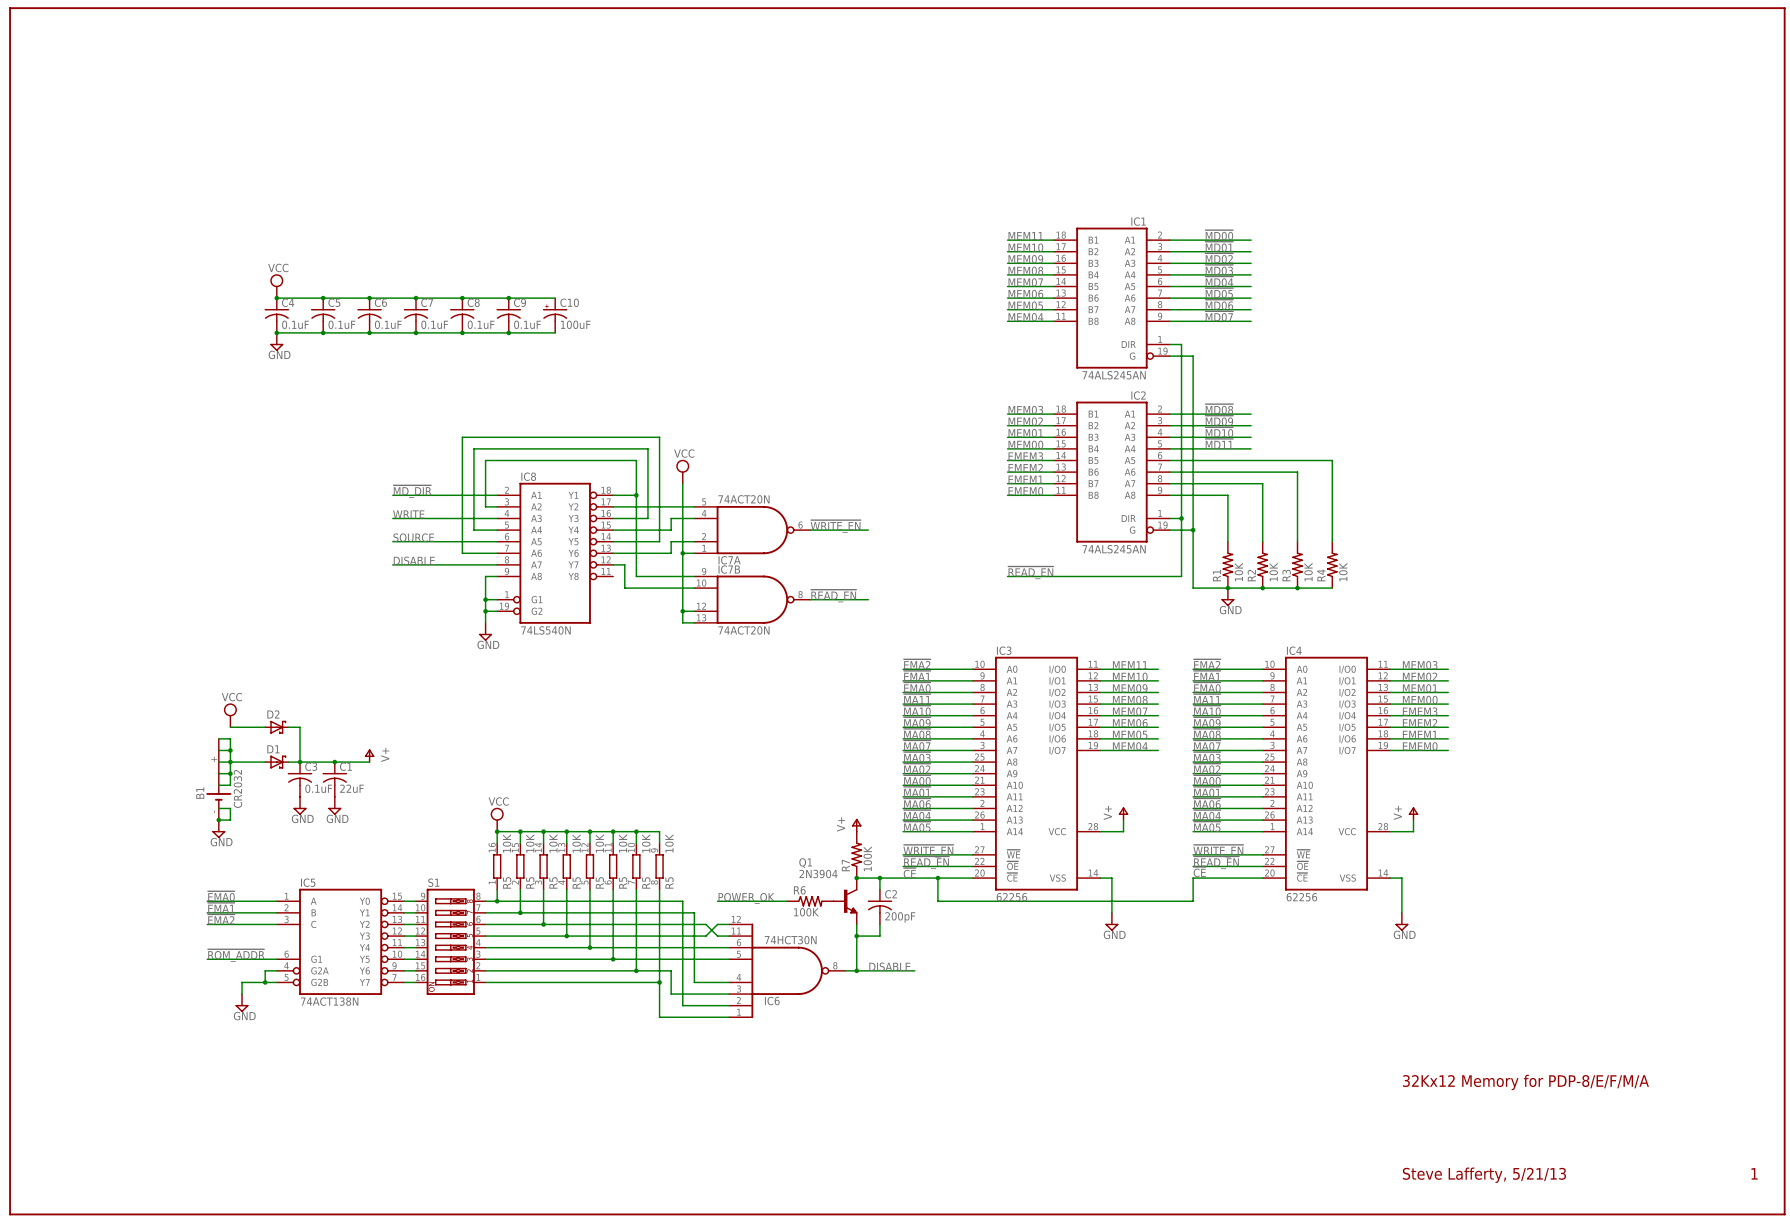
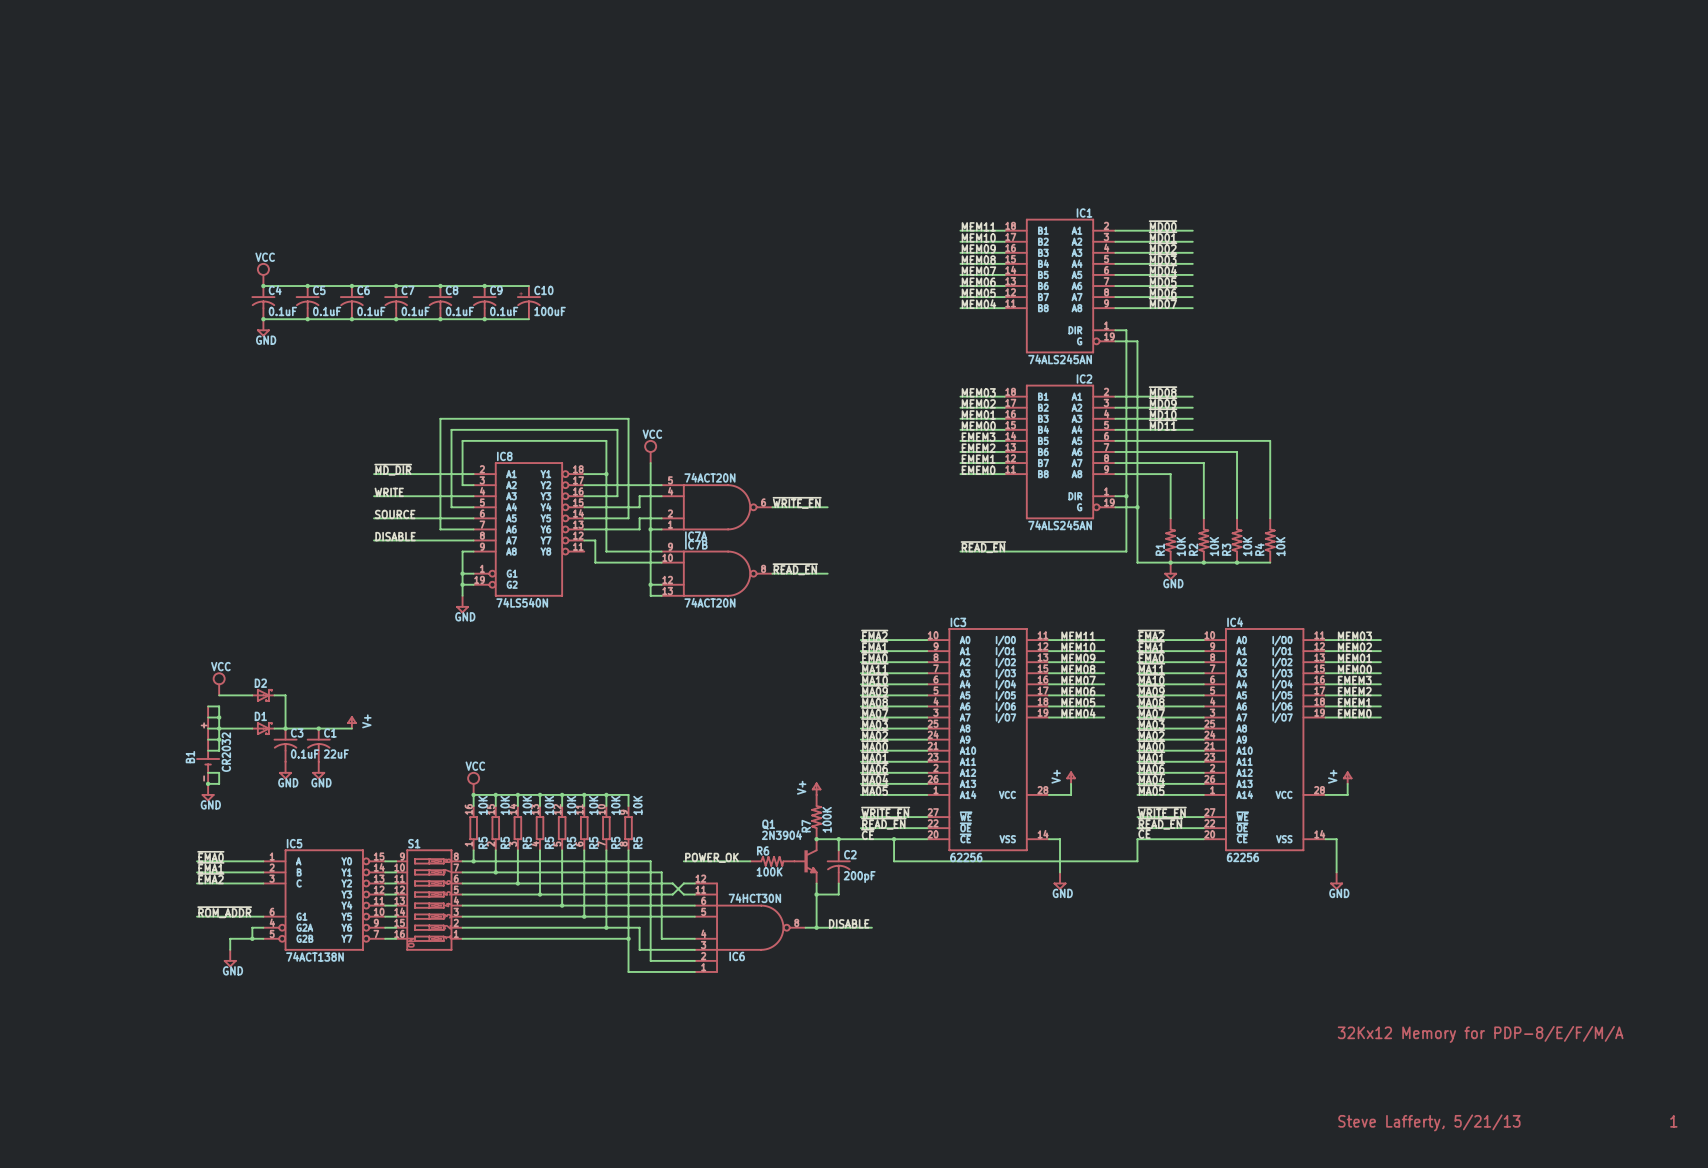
part: (897, 611) -> none

